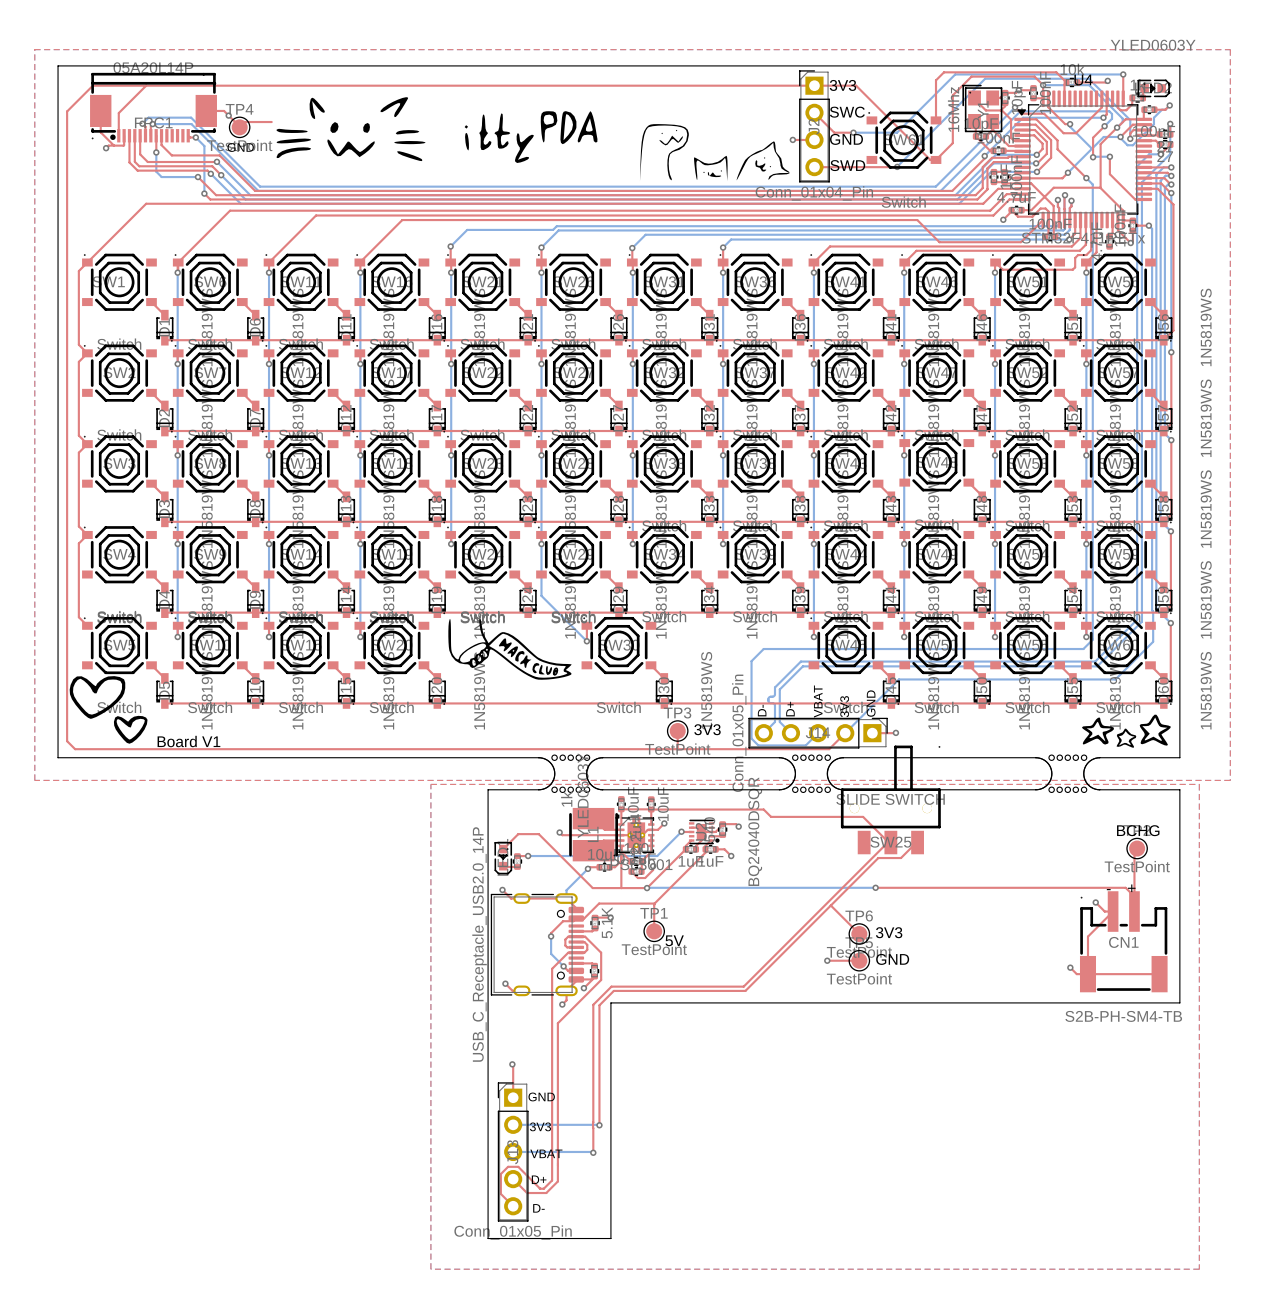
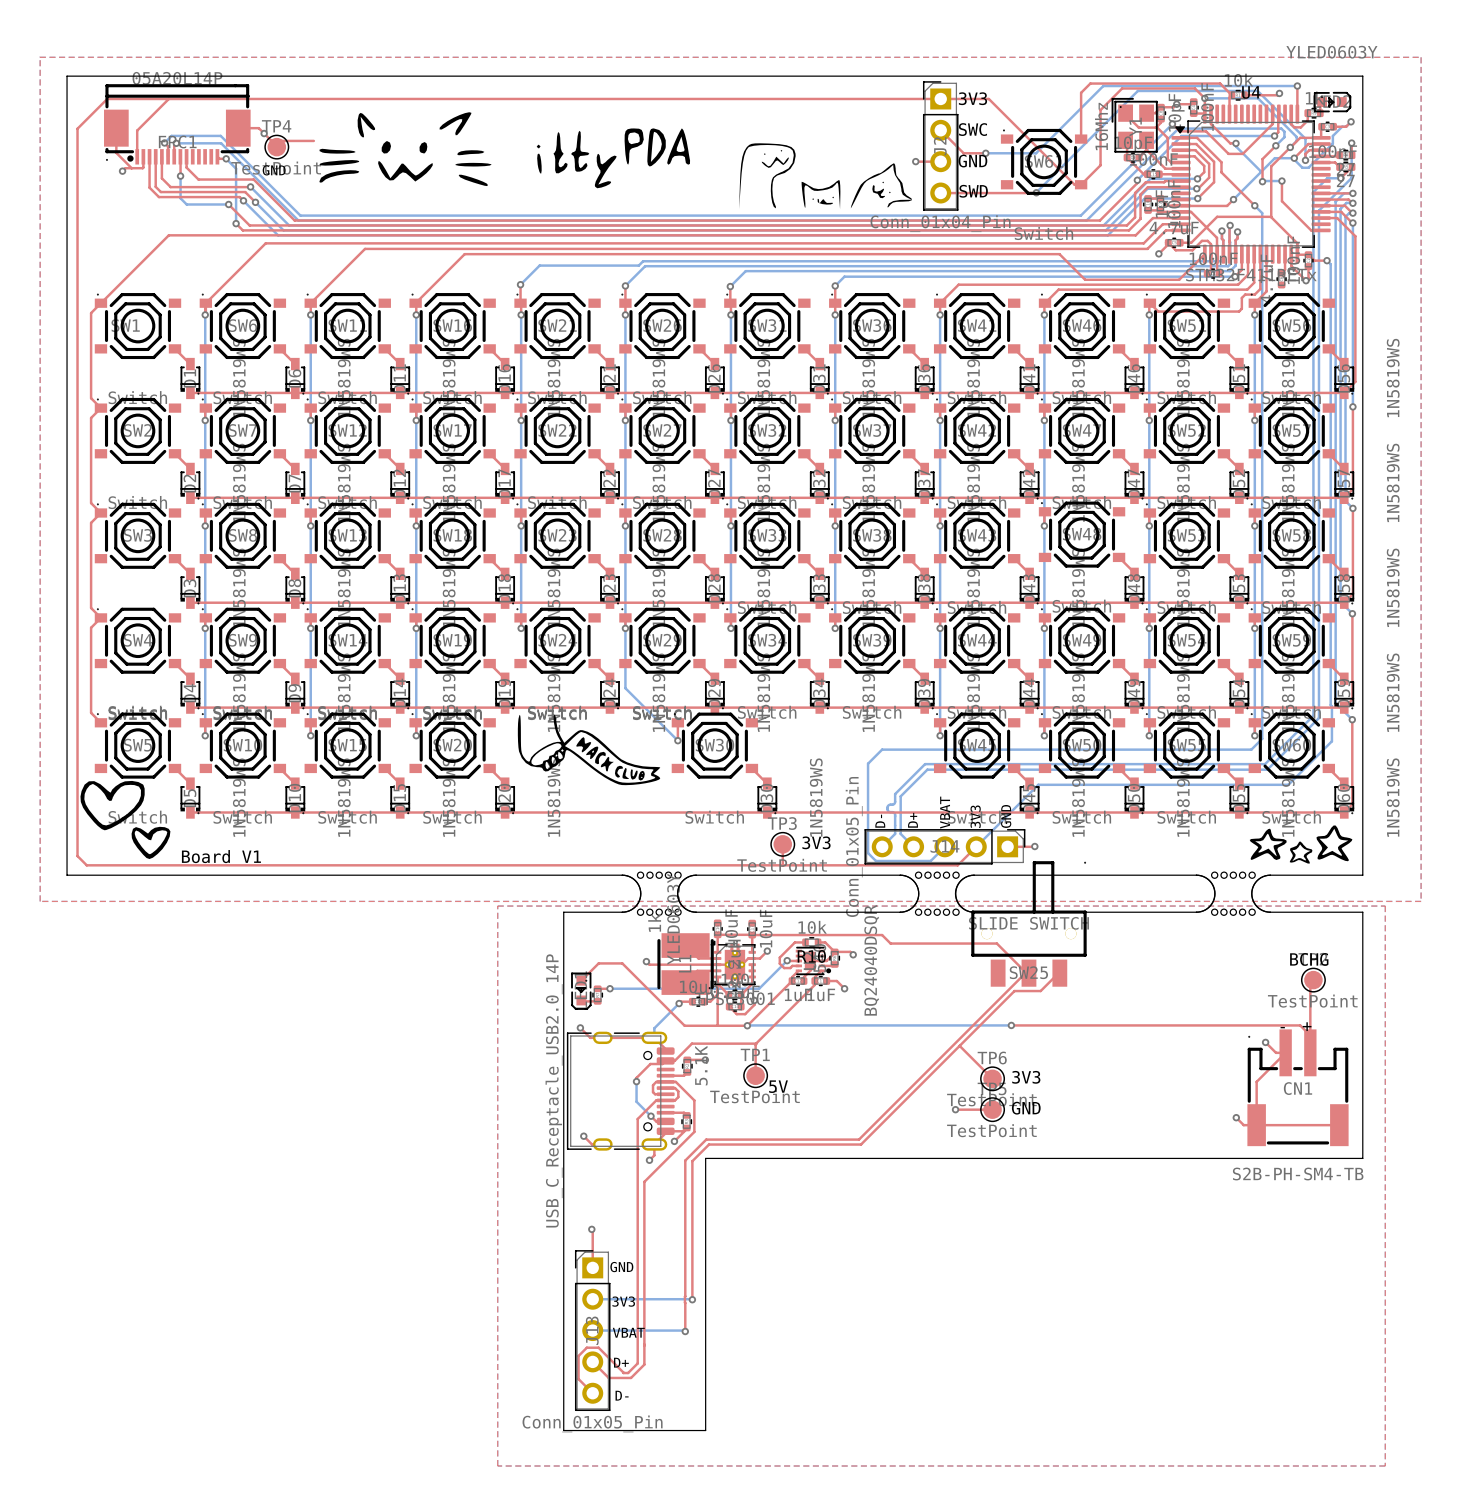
top track: none -> (805, 942) (794, 942) (779, 957) (779, 963) (784, 968) (798, 965)
R10: none -> 10k (811, 942)
top track: none -> (818, 942) (825, 942) (834, 951)

